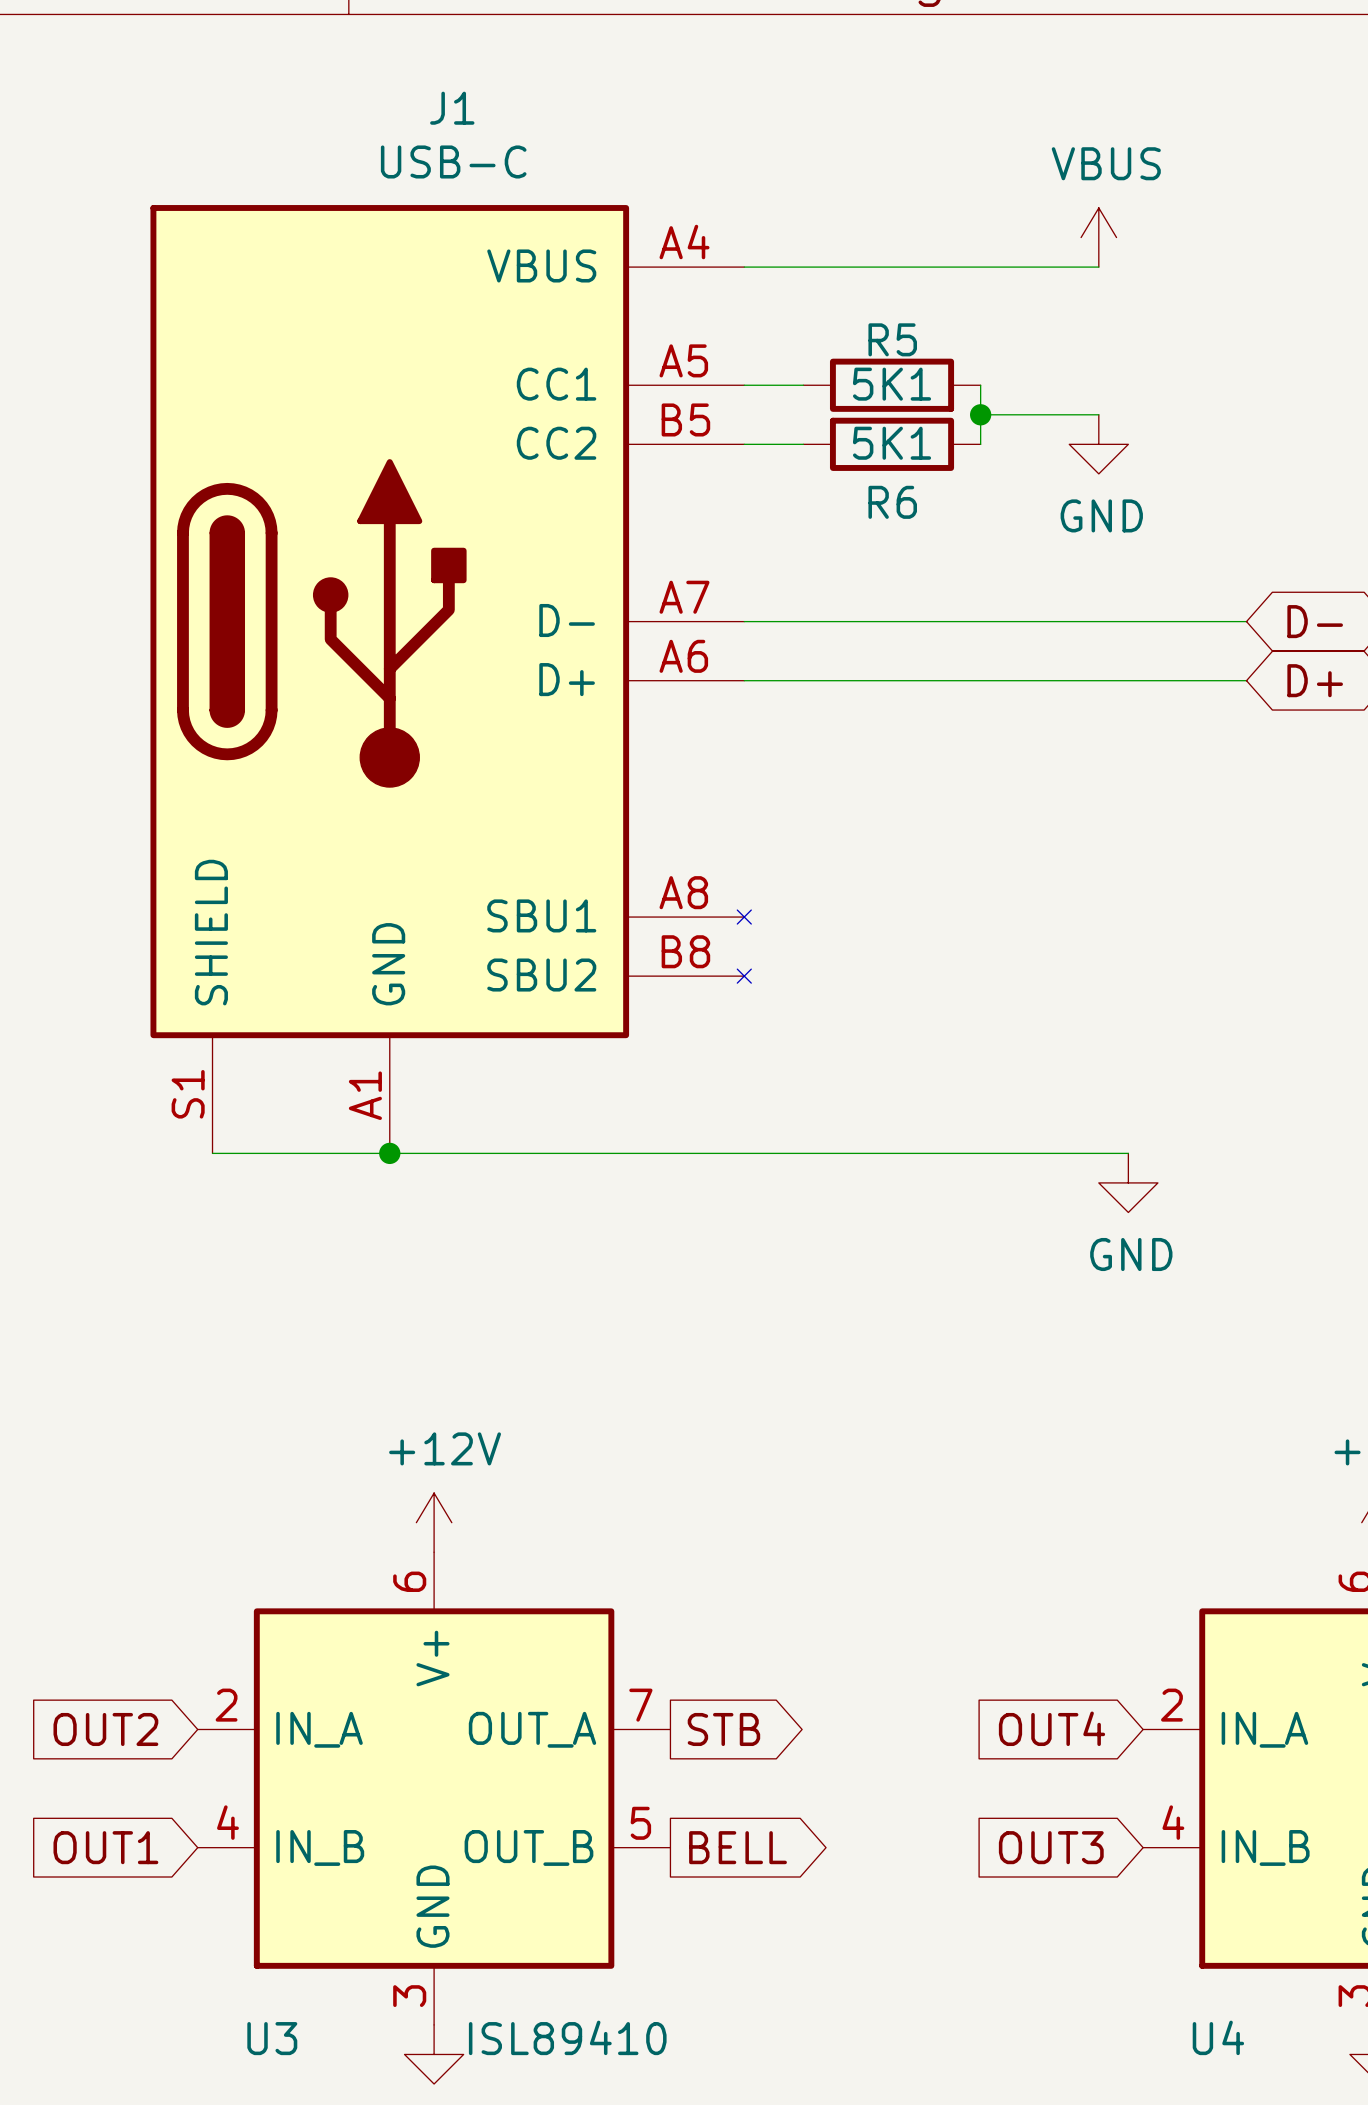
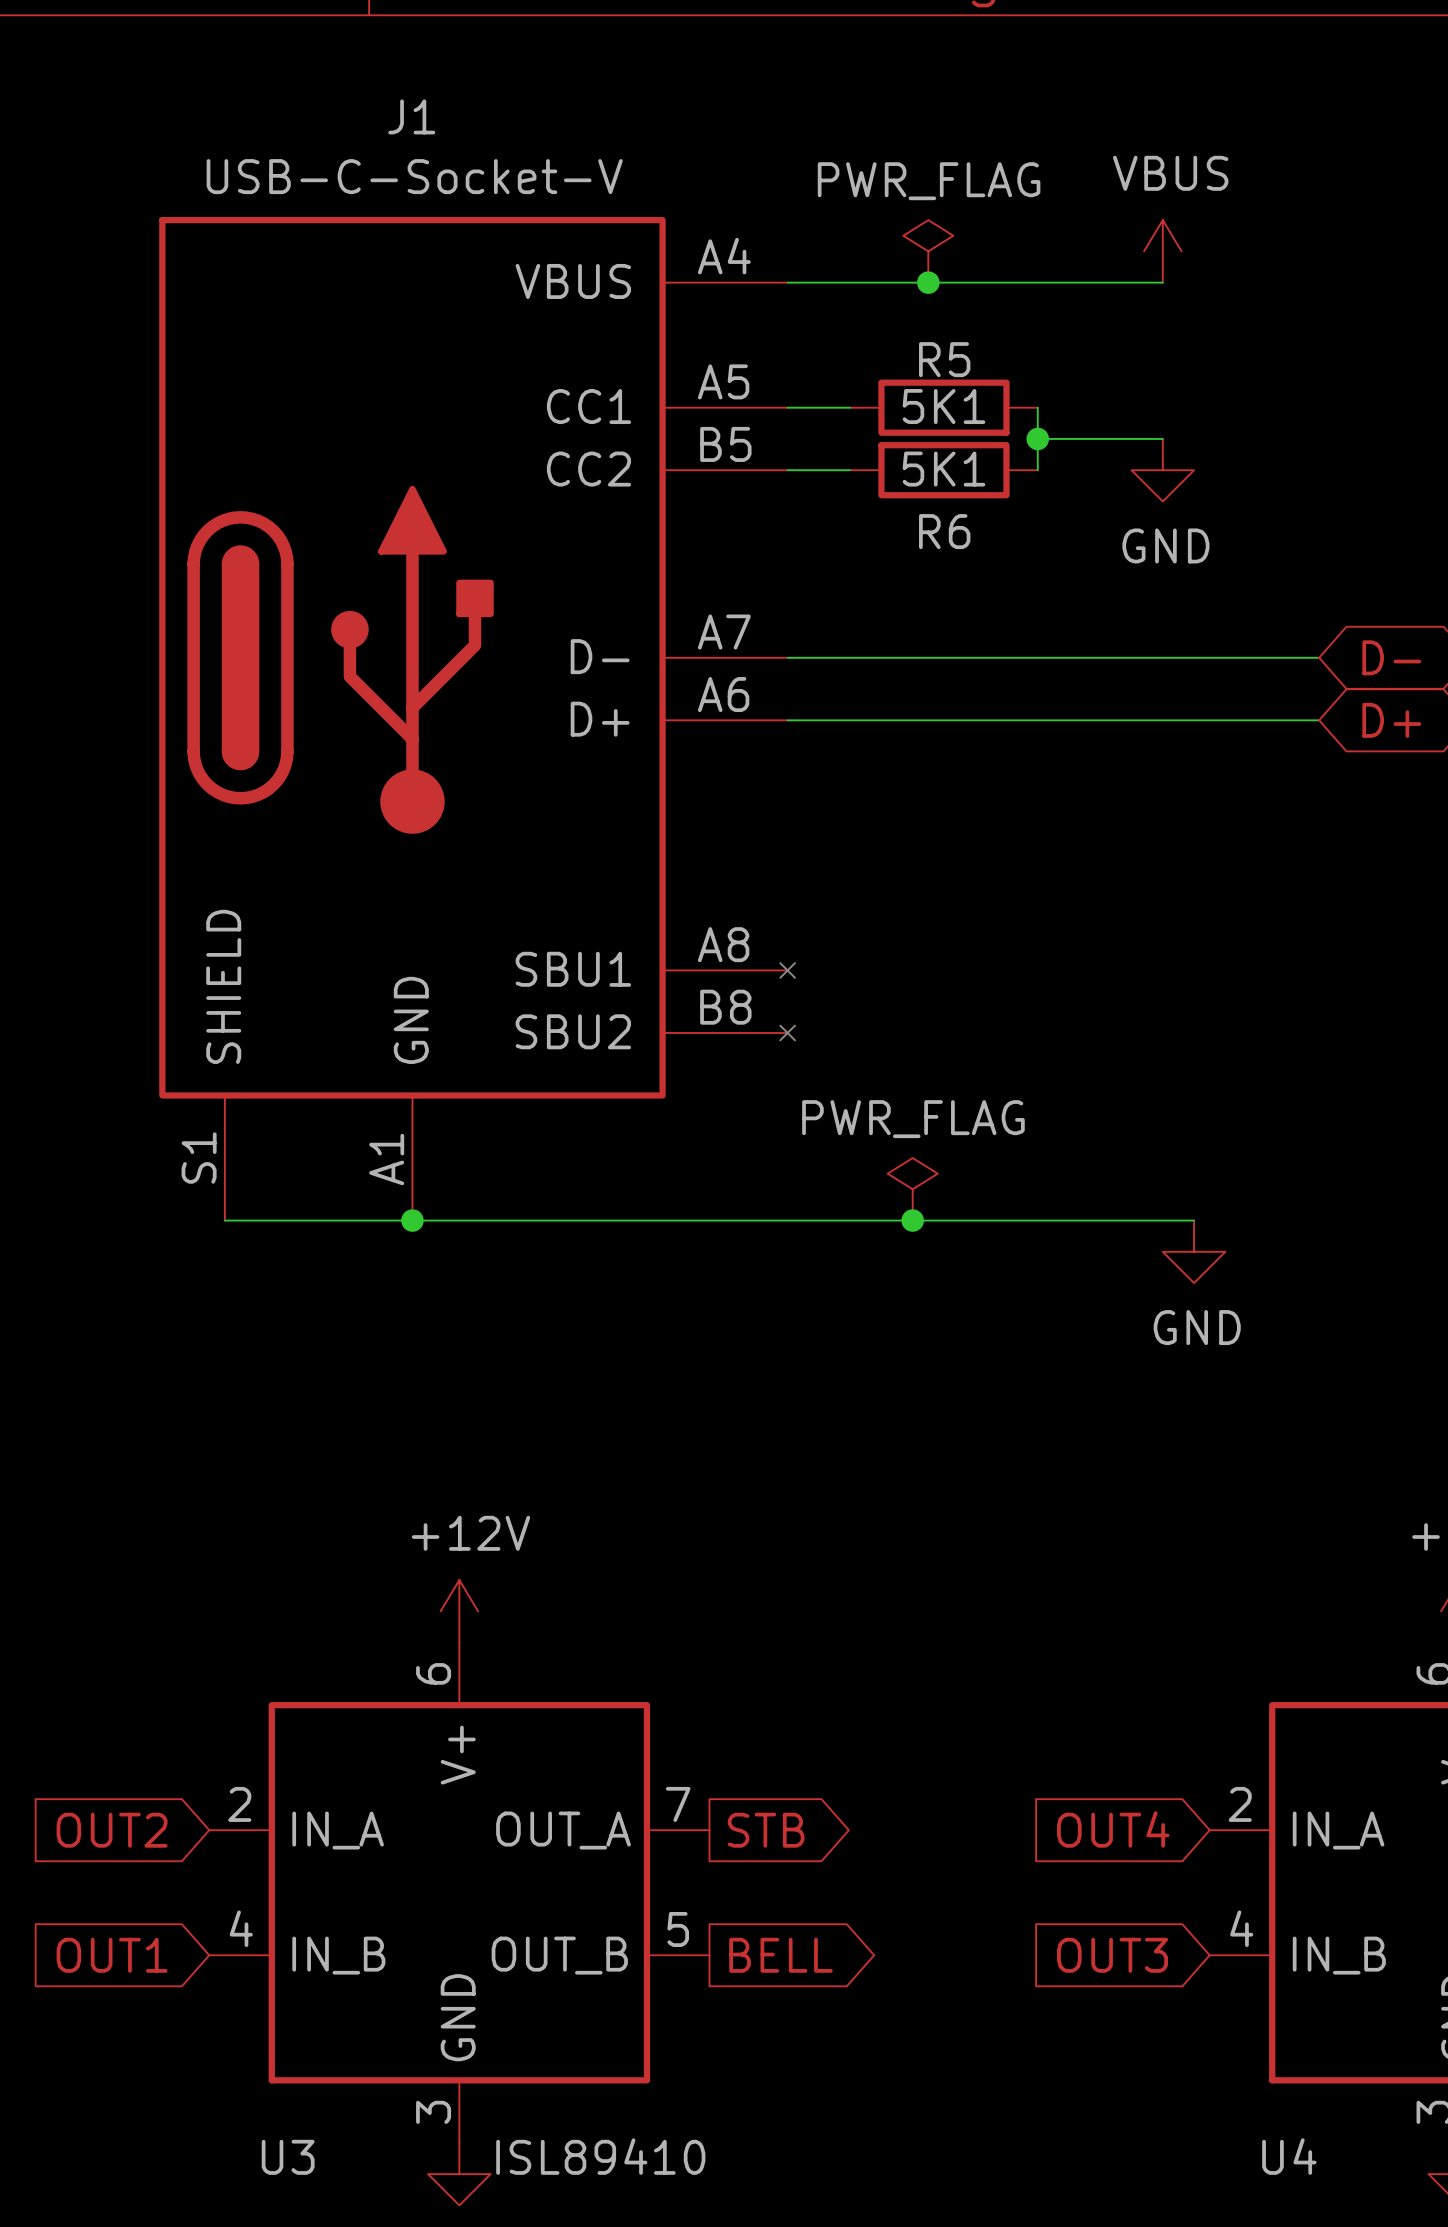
J1 name position: J1 (452, 108) -> J1 (411, 116)
J1 value: USB-C (453, 161) -> USB-C-Socket-V (414, 176)
power symbol: none -> PWR_FLAG (928, 251)
junction: none -> (928, 282)
power symbol: none -> PWR_FLAG (912, 1189)
junction: none -> (912, 1220)

